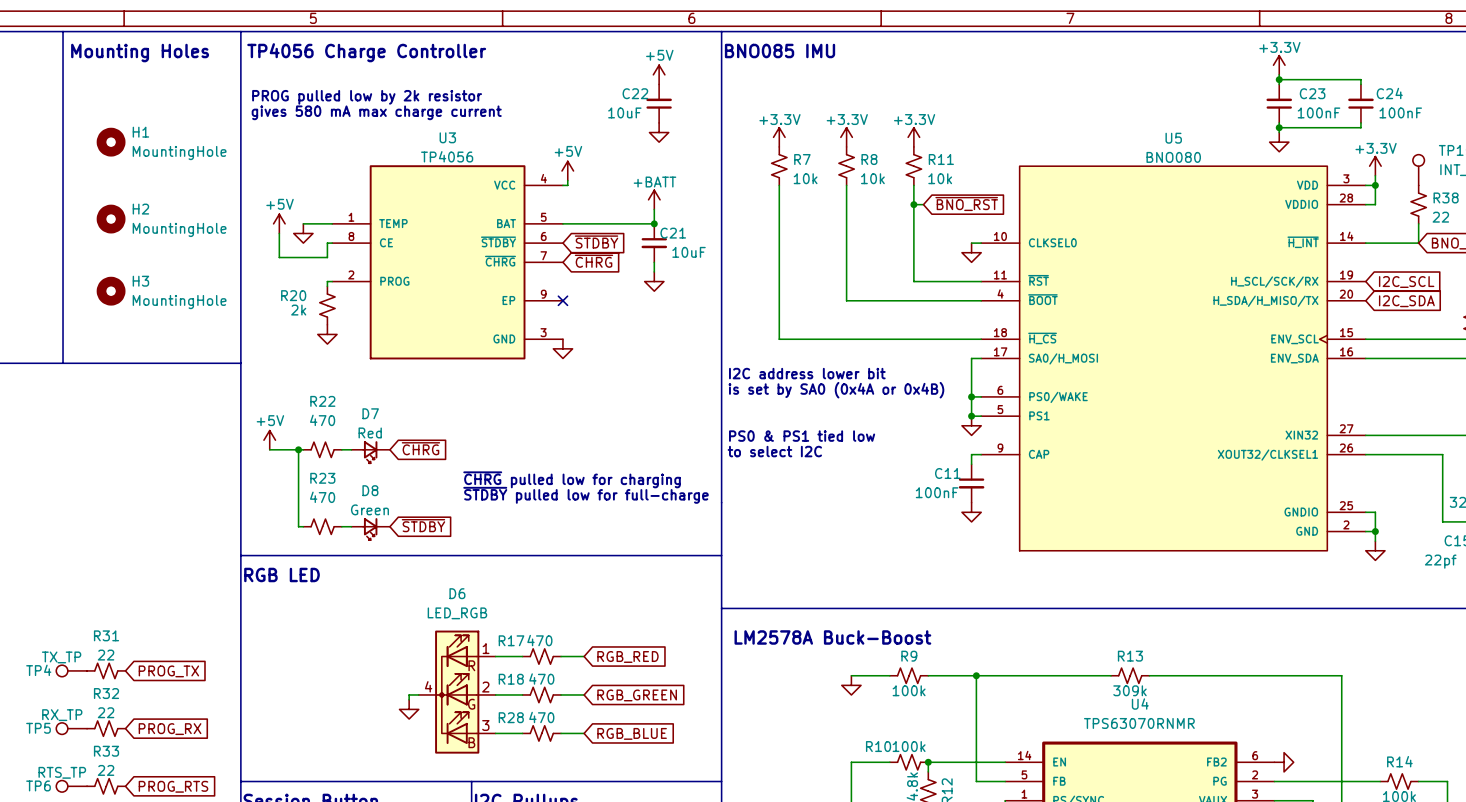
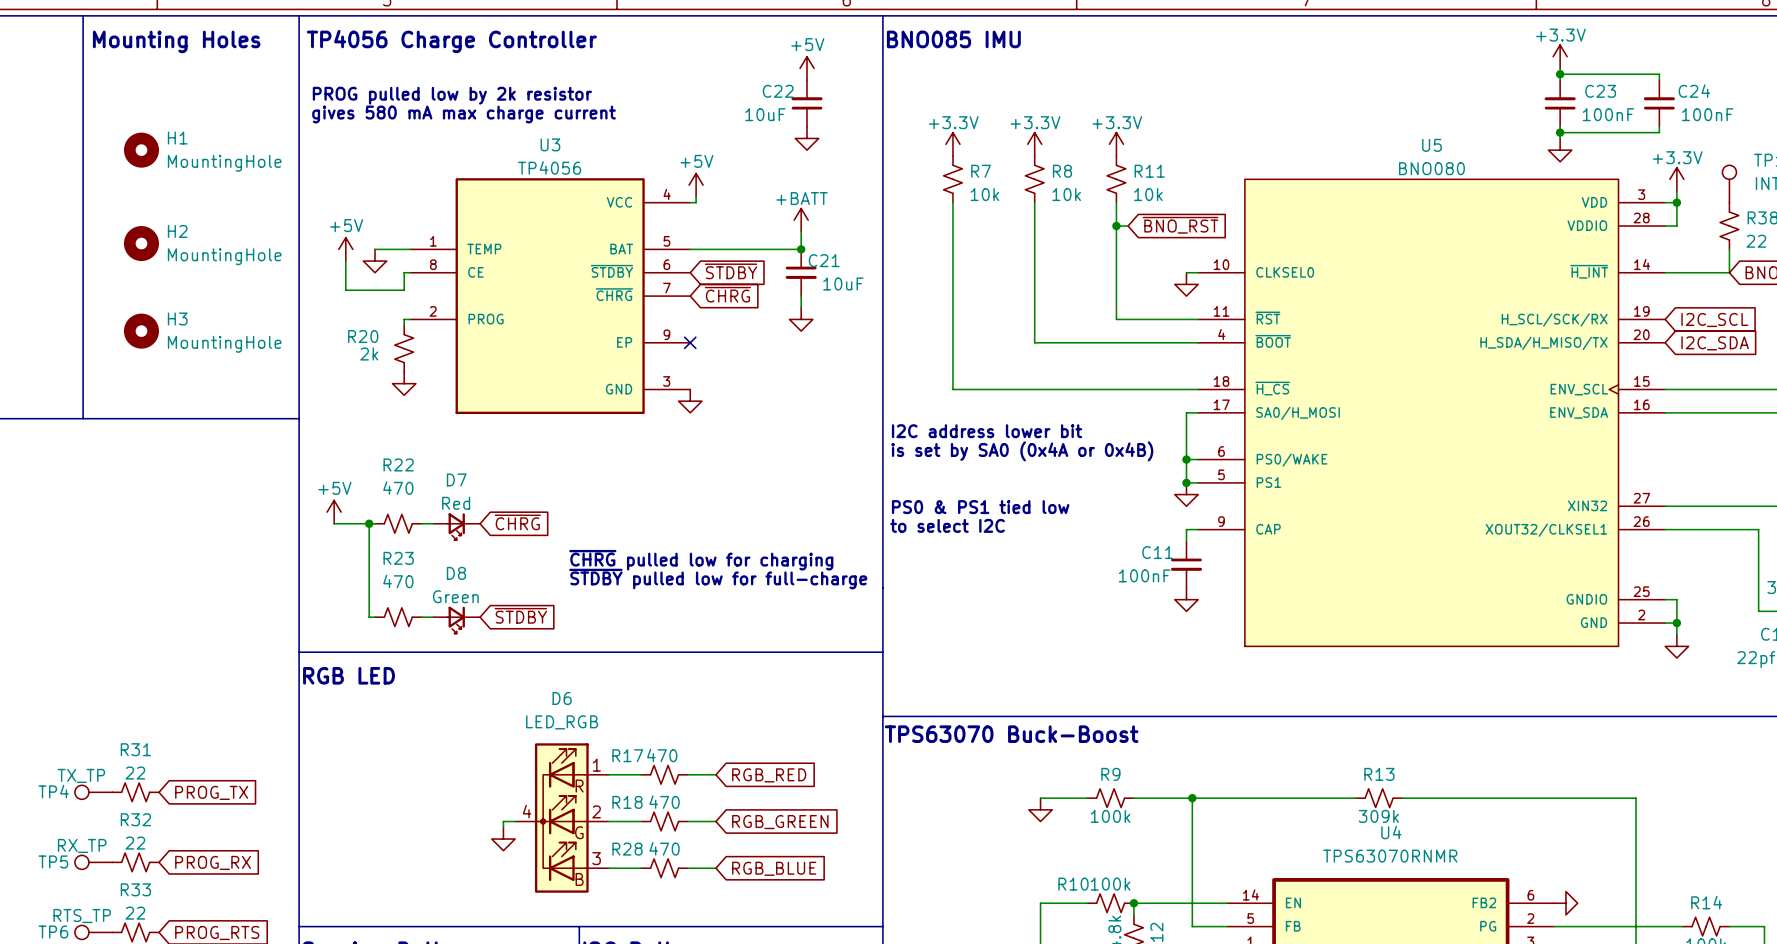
text: LM2578A Buck-Boost (832, 637) -> TPS63070 Buck-Boost (1011, 734)

